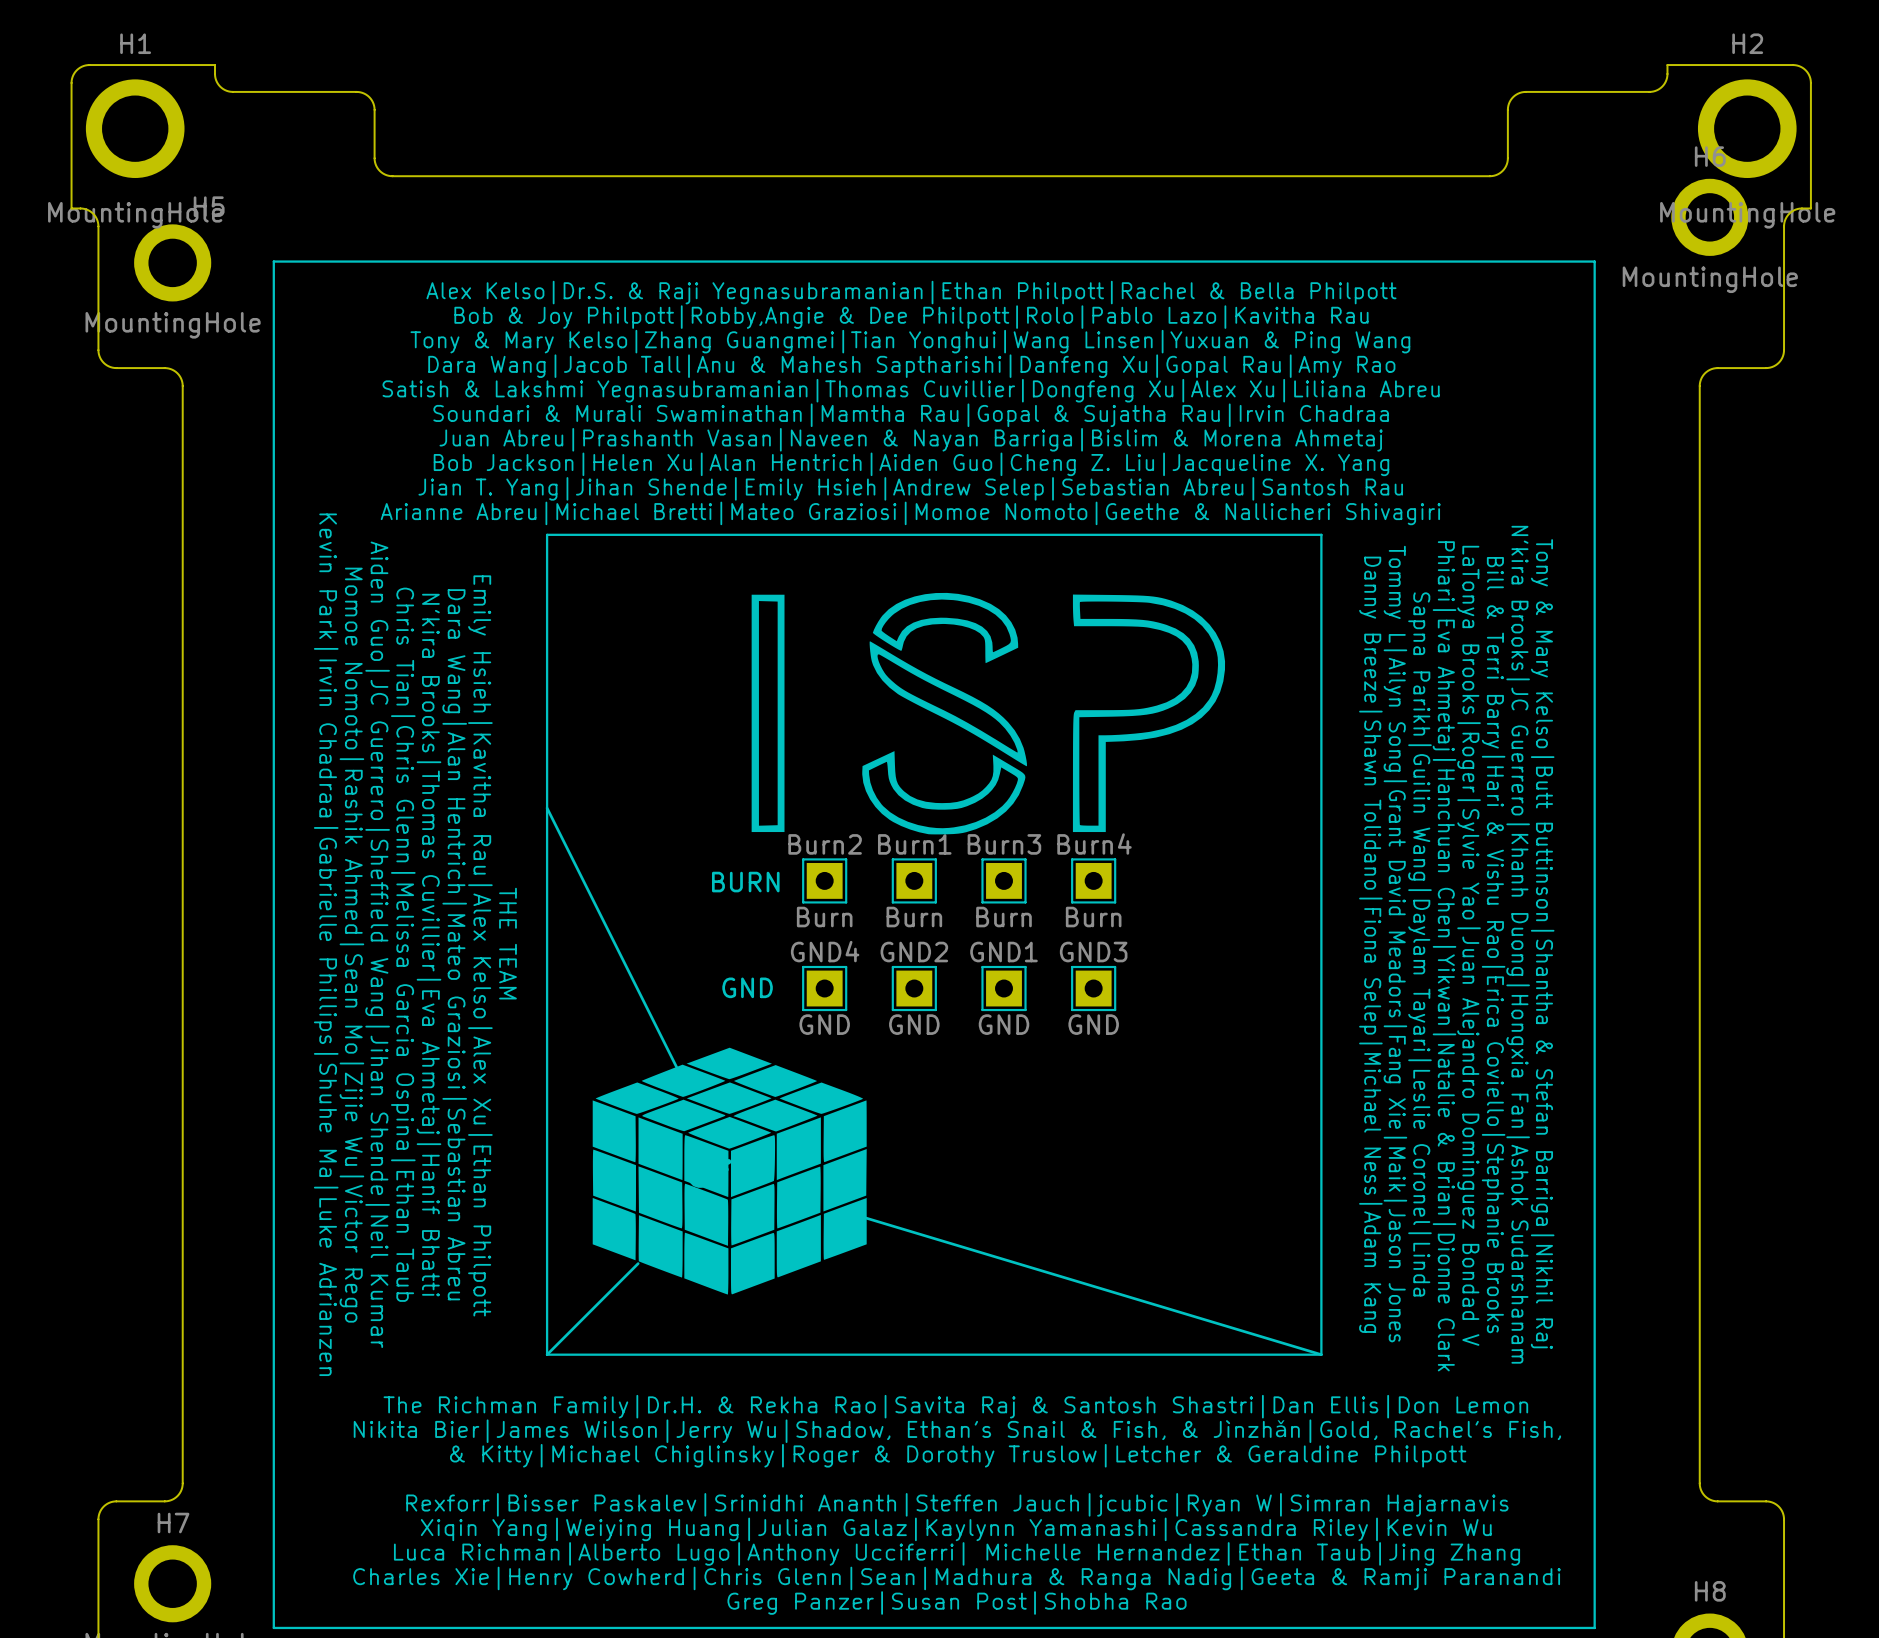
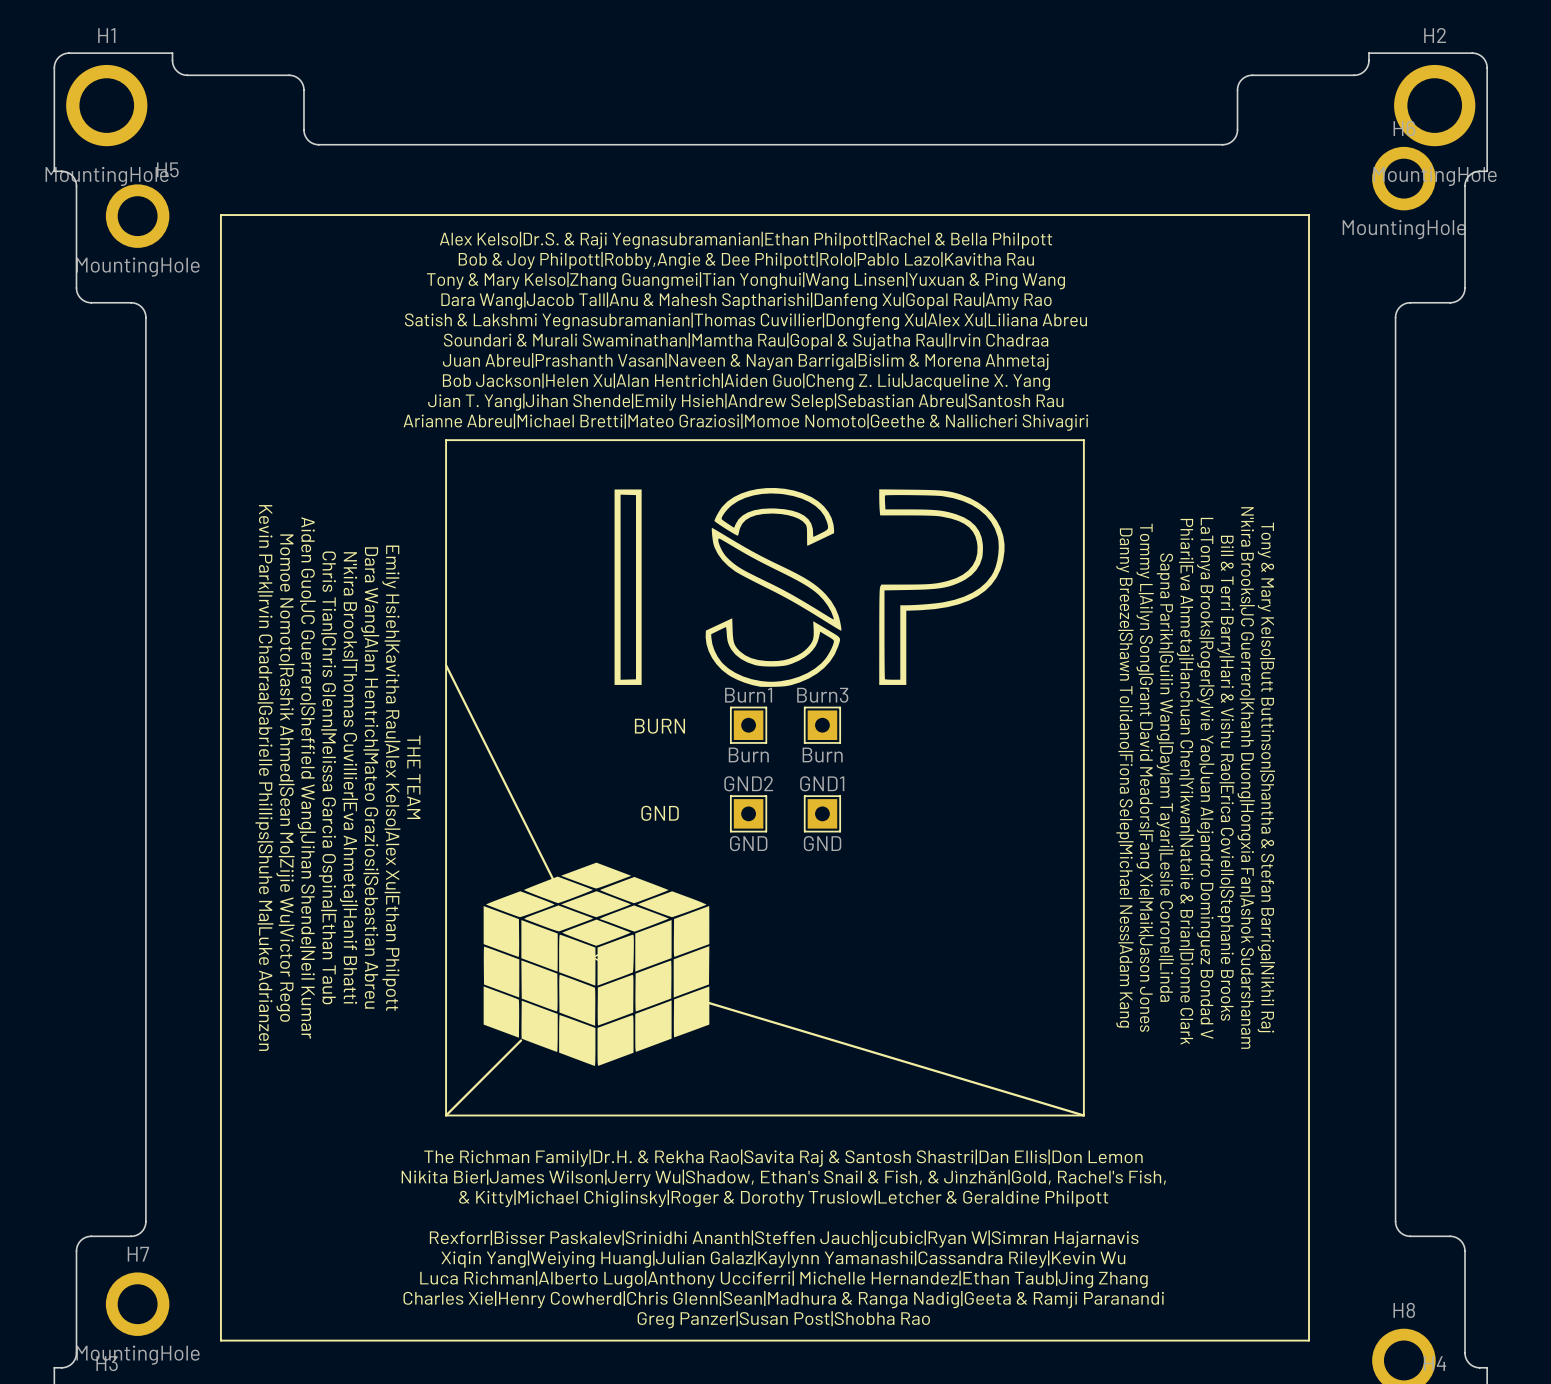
Burn2: Burn (824, 880) -> none
Burn4: Burn (1093, 880) -> none
text position: BURN (745, 882) -> BURN (659, 726)
text position: GND (747, 987) -> GND (660, 813)
GND4: GND (824, 988) -> none
GND3: GND (1093, 988) -> none

